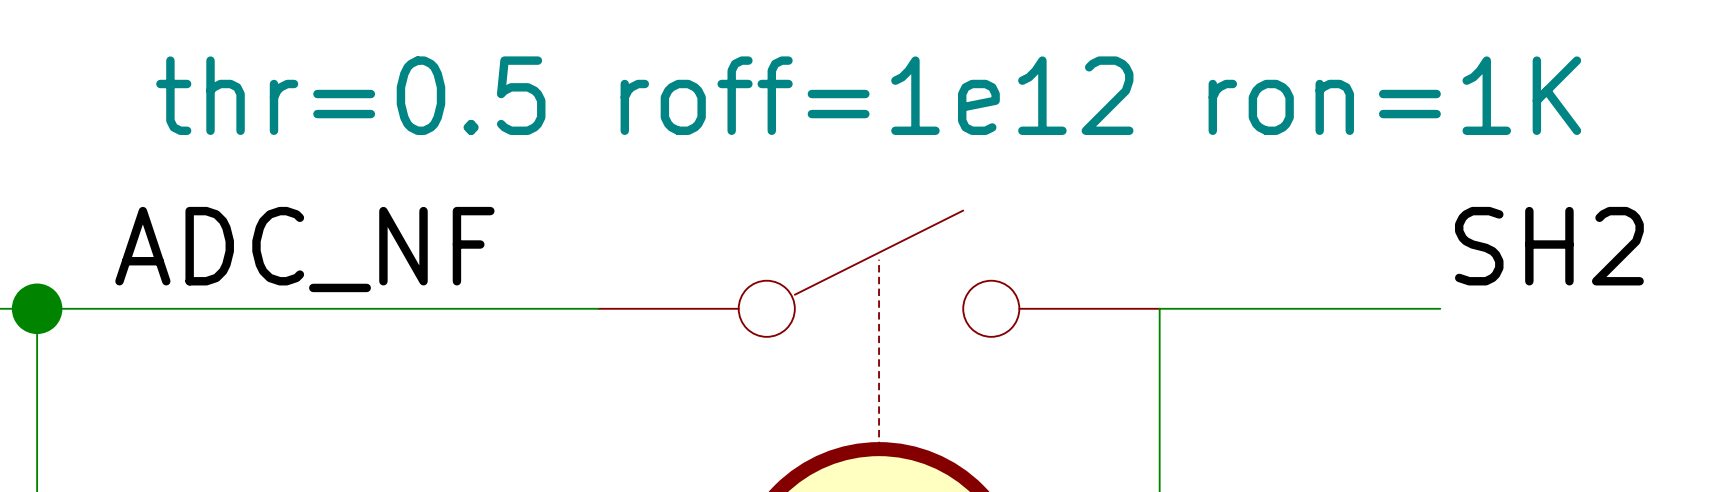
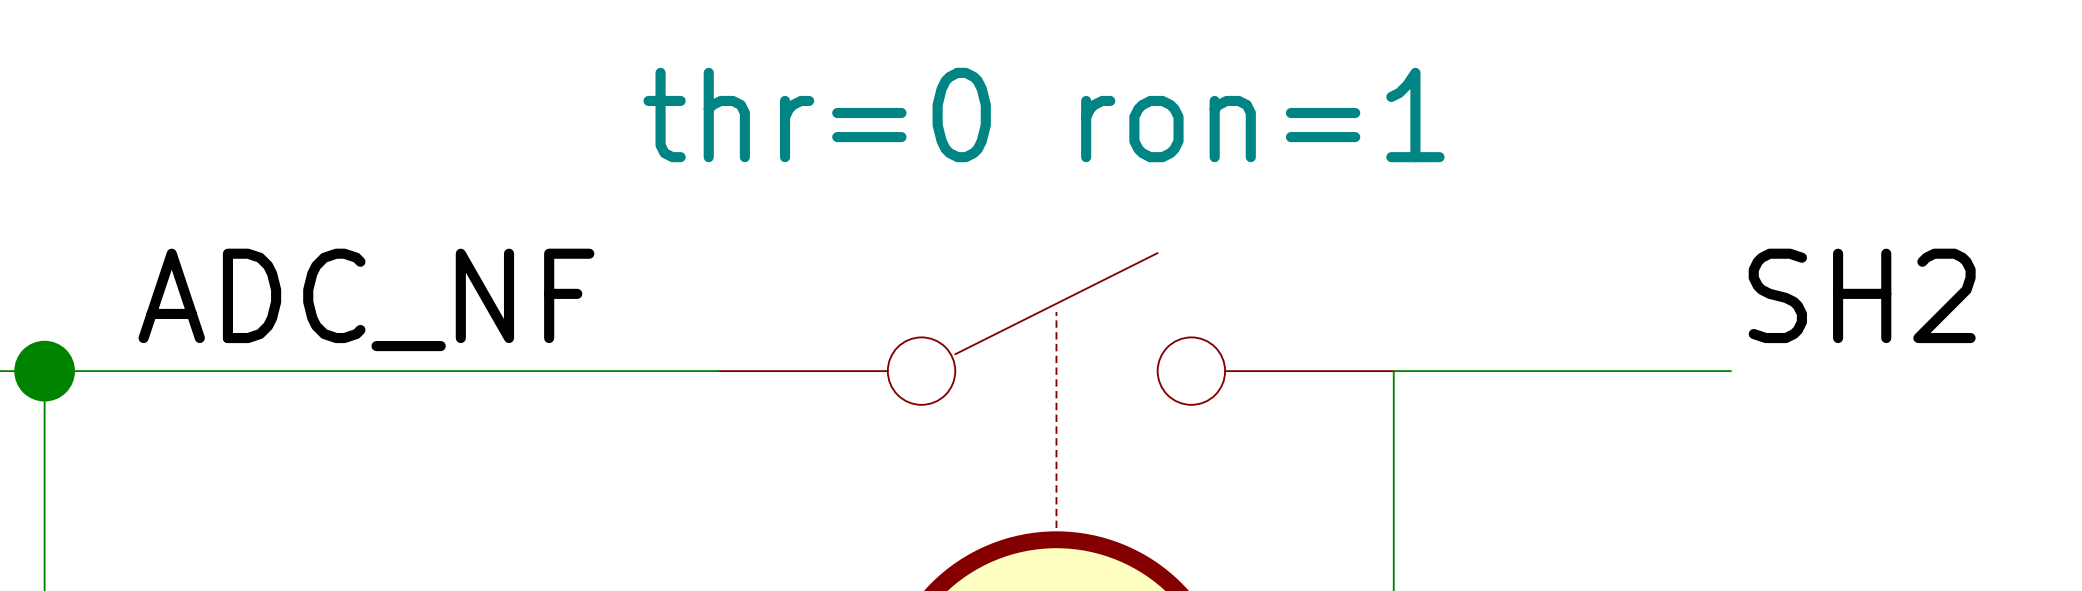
part text: thr=0.5 roff=1e12 ron=1K (868, 95) -> thr=0 ron=1 (1044, 115)

